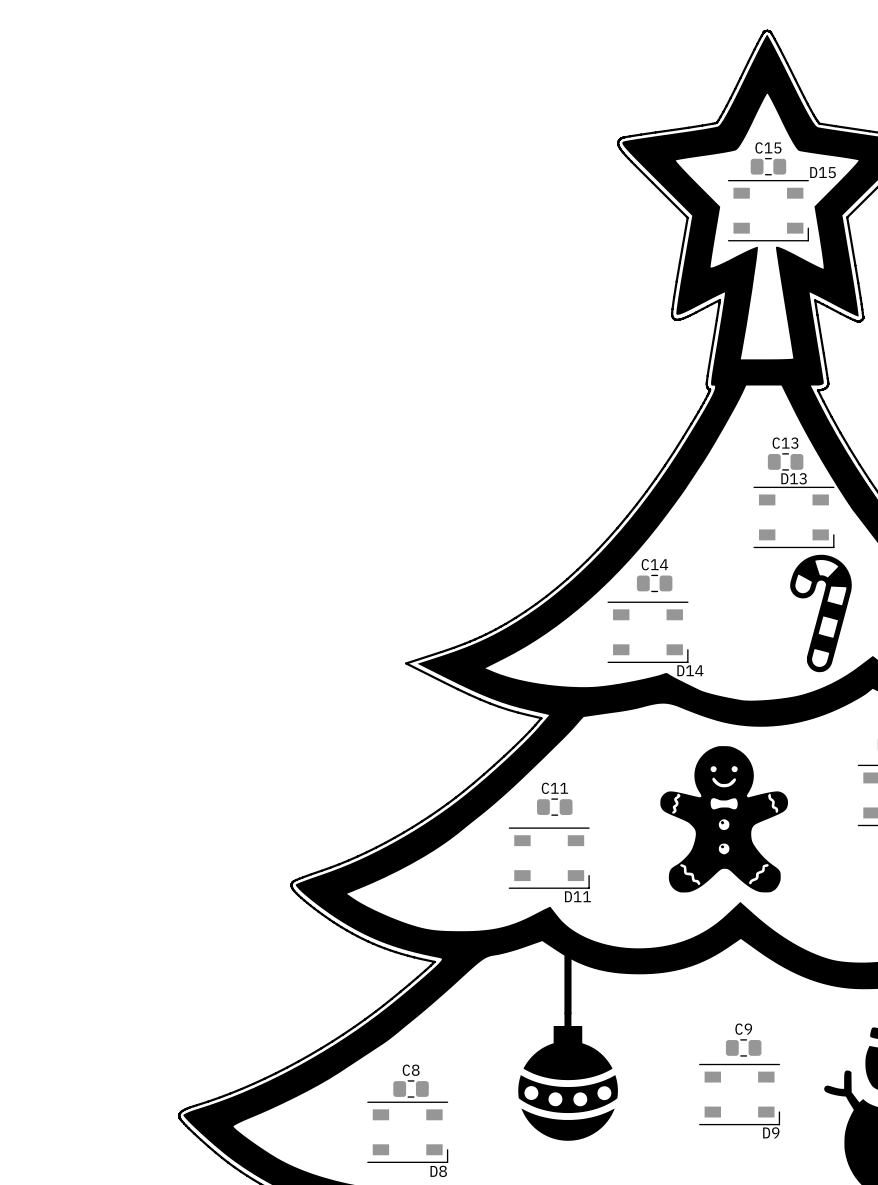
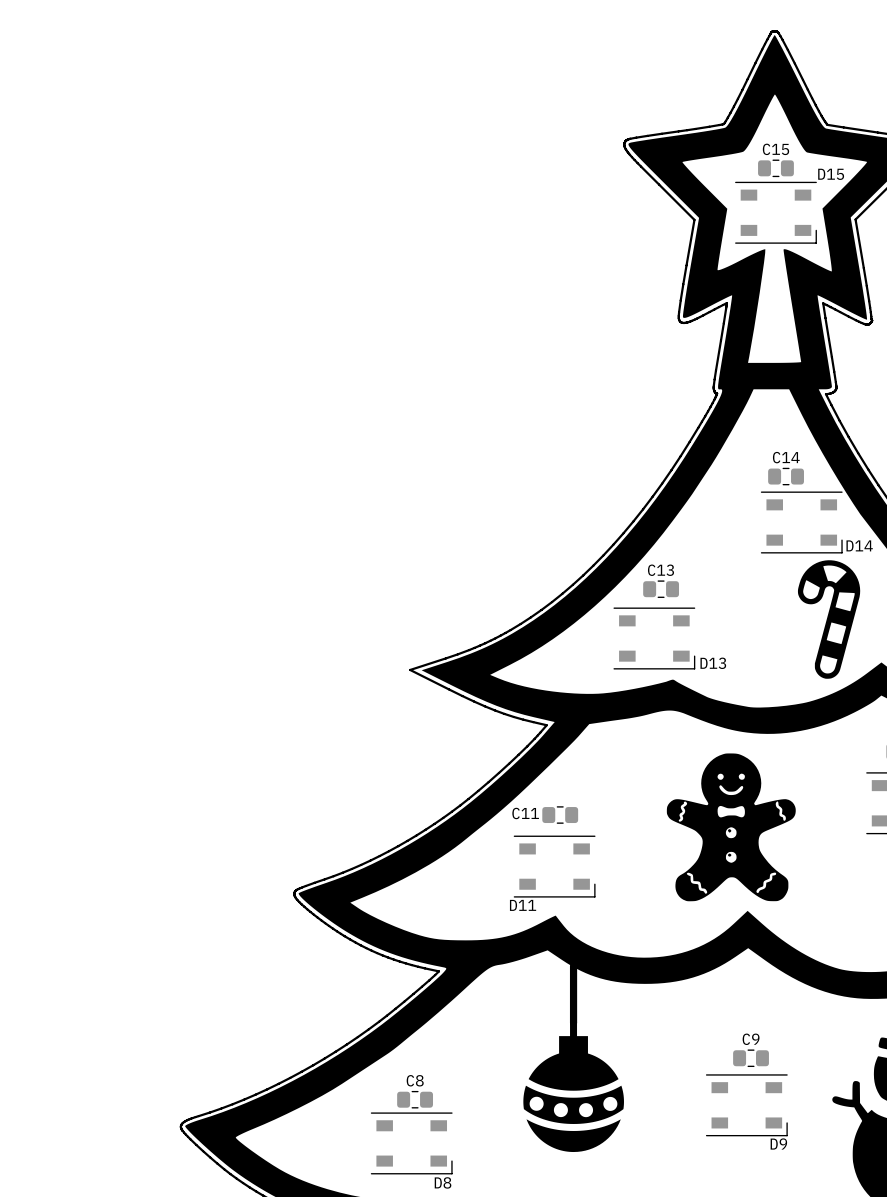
C13: (785, 461) -> none
C14: none -> (786, 476)
D13 name: D13 (794, 478) -> D14 (859, 545)
C14 name: C14 (654, 564) -> C13 (660, 570)
D14 name: D14 (690, 670) -> D13 (713, 663)
C11 name position: C11 (554, 788) -> C11 (525, 813)
D11 name position: D11 (577, 896) -> D11 (523, 905)

